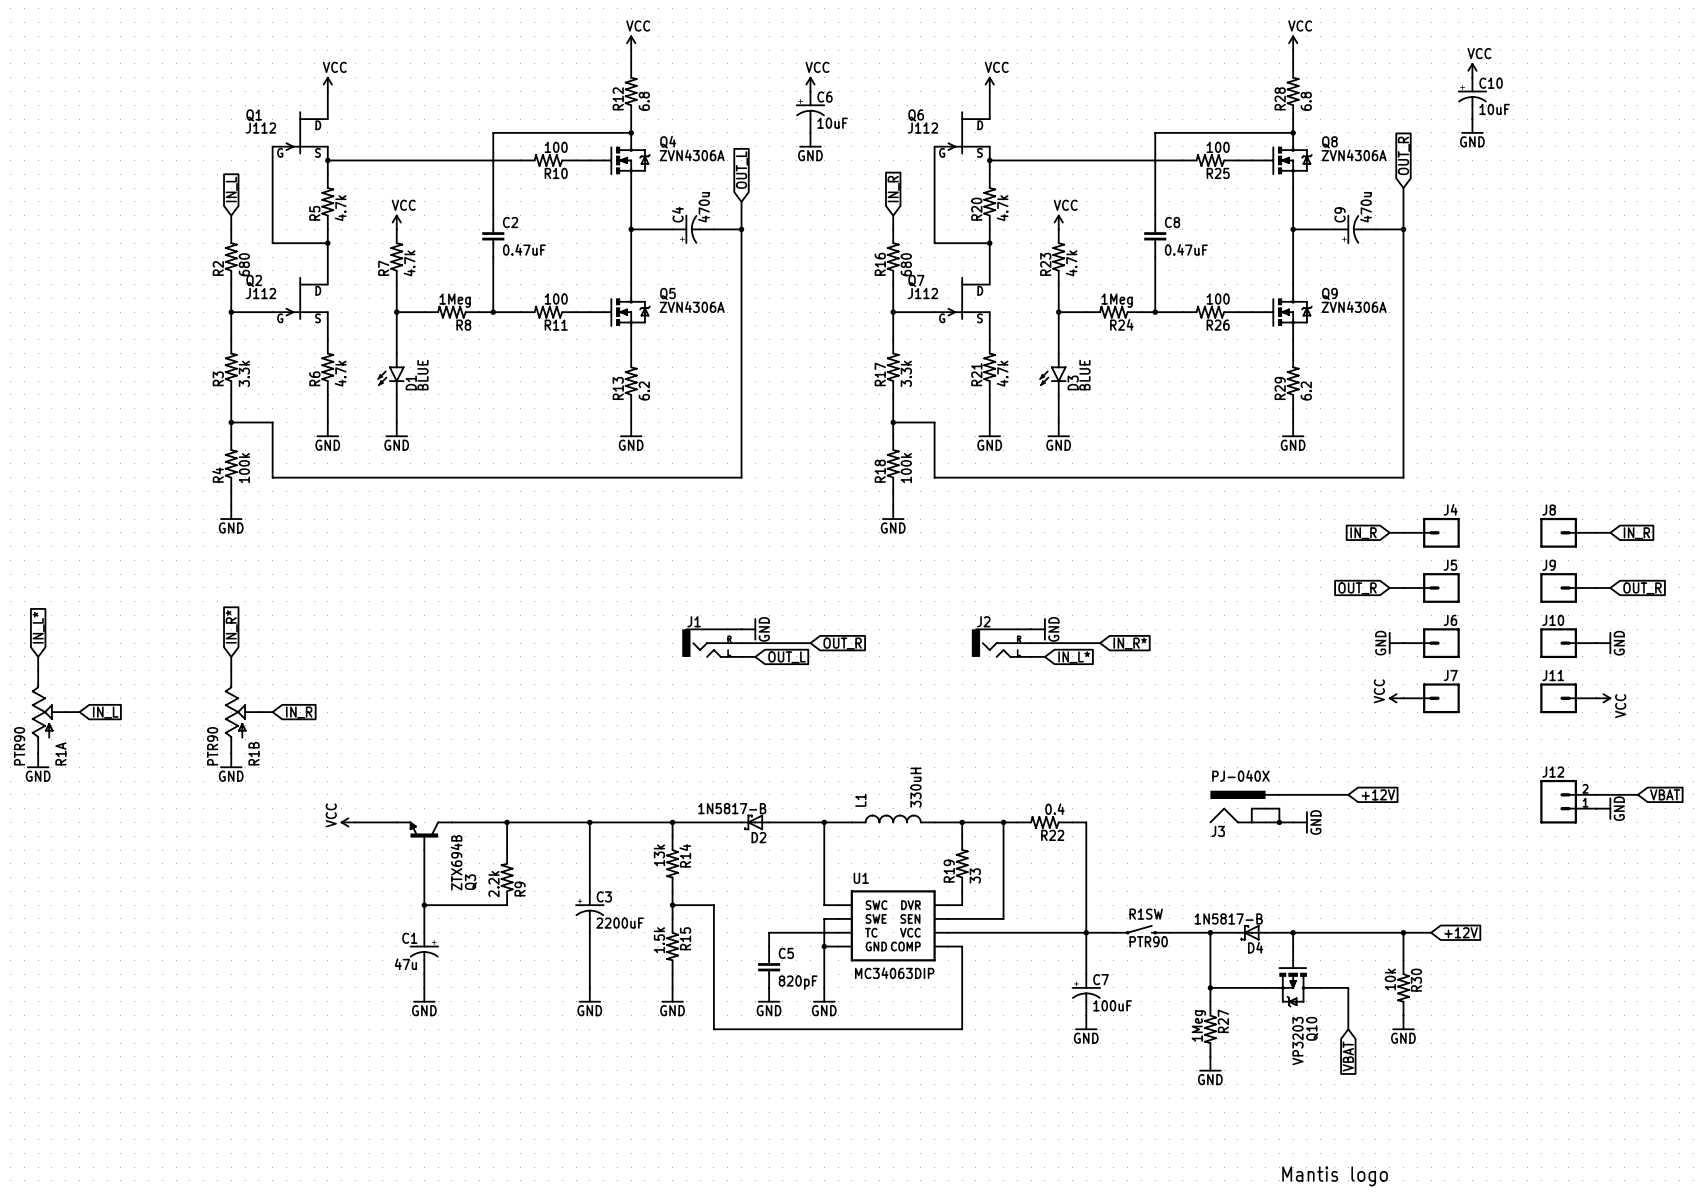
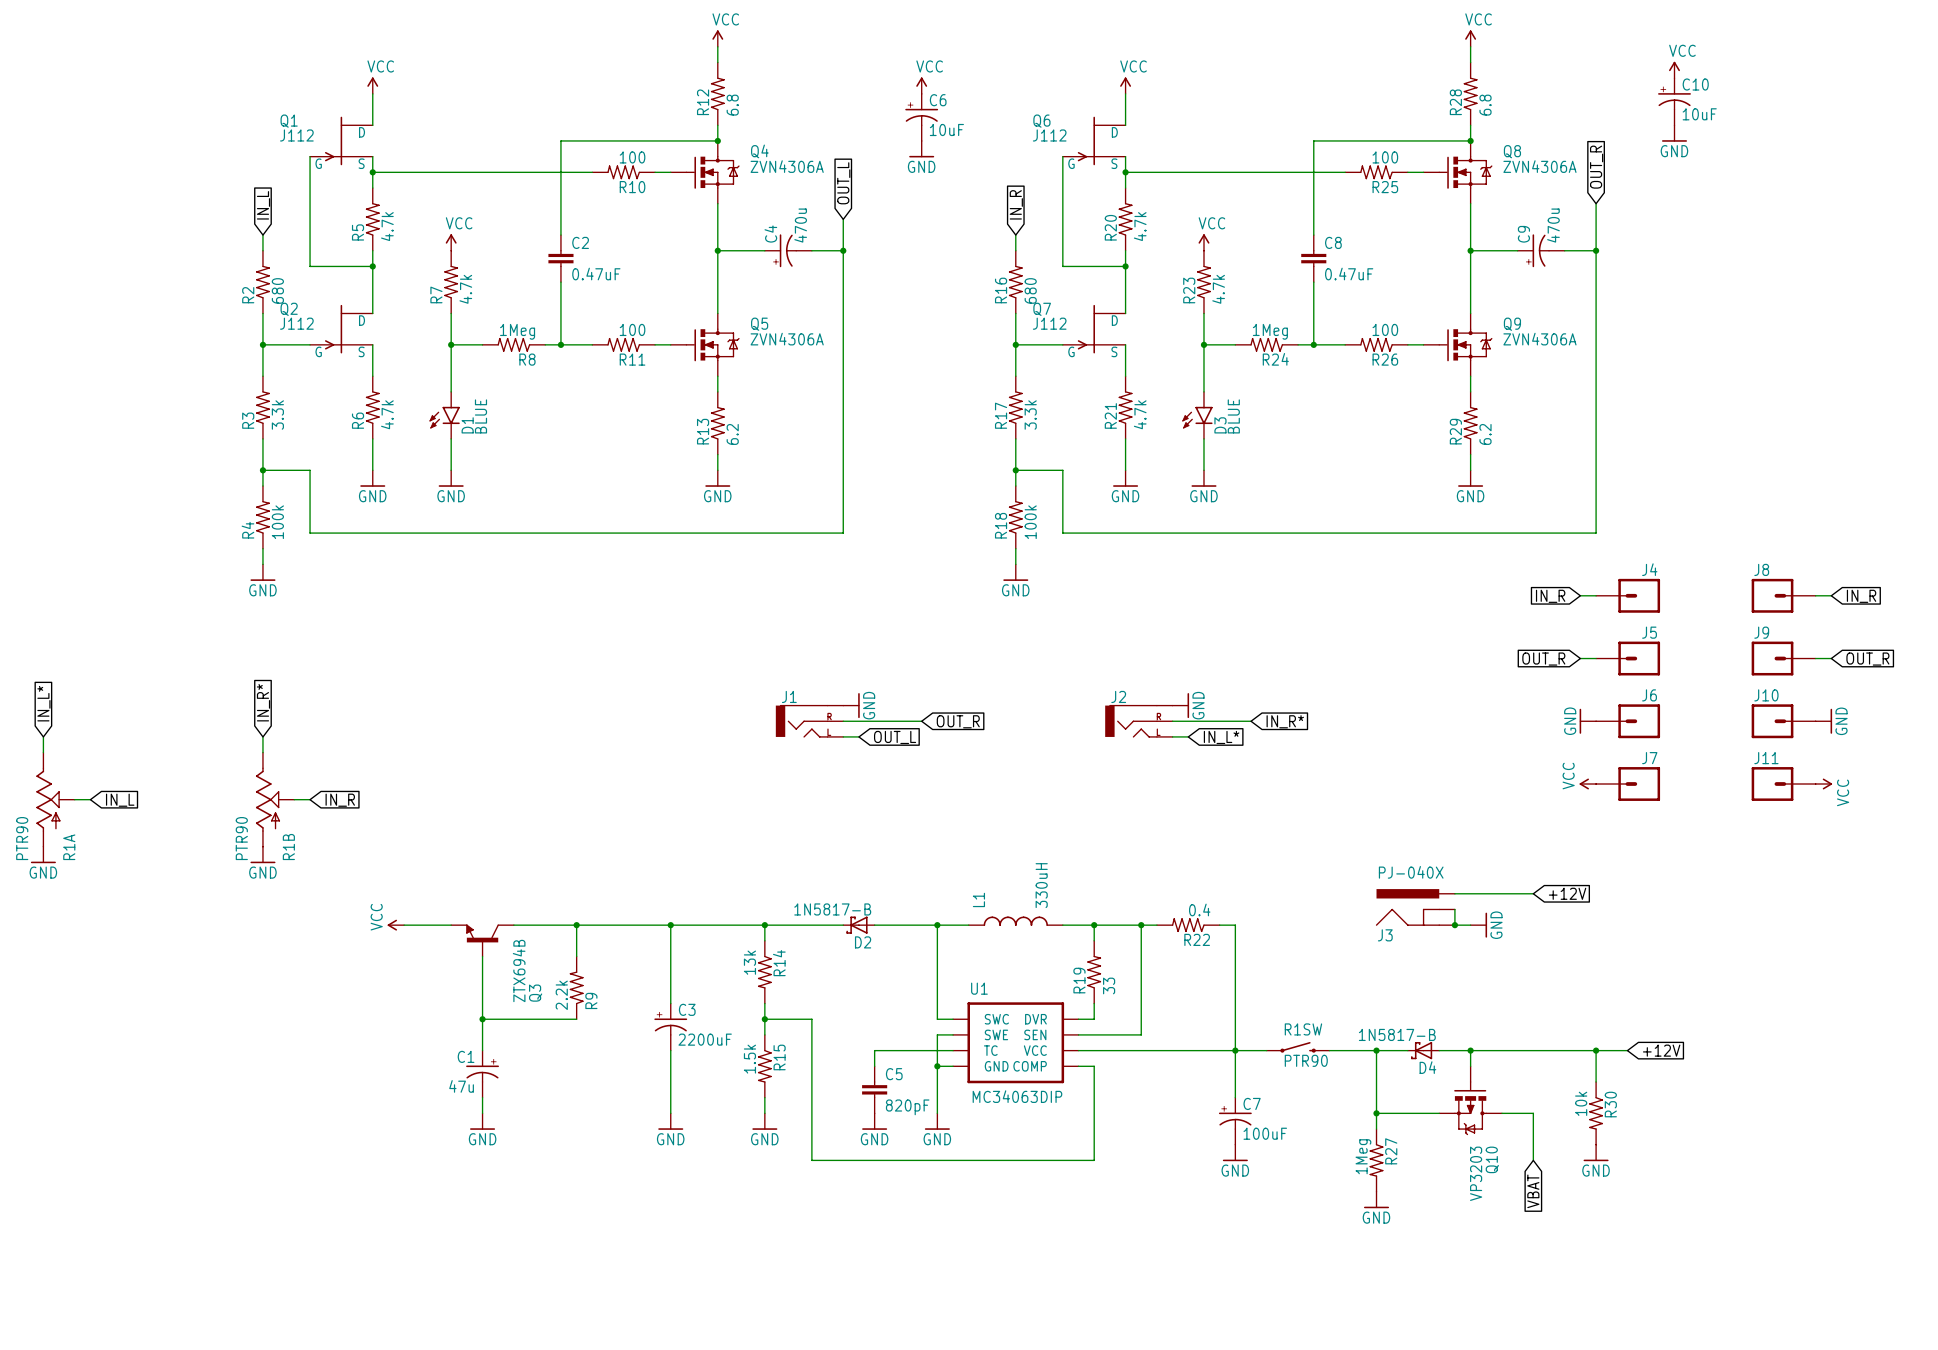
wire: (1596, 794) (1637, 794) -> none
global label: VBAT (1665, 794) -> none
J12: (1568, 801) -> none
power symbol: GND (1603, 808) -> none
part: (1335, 1176) -> none

